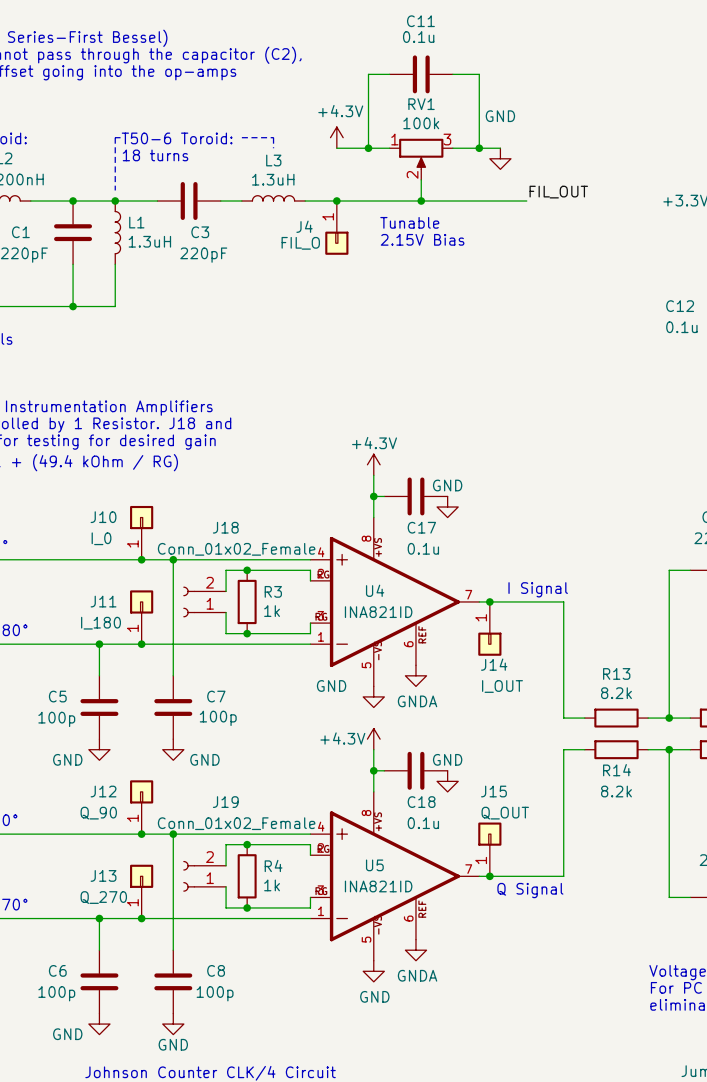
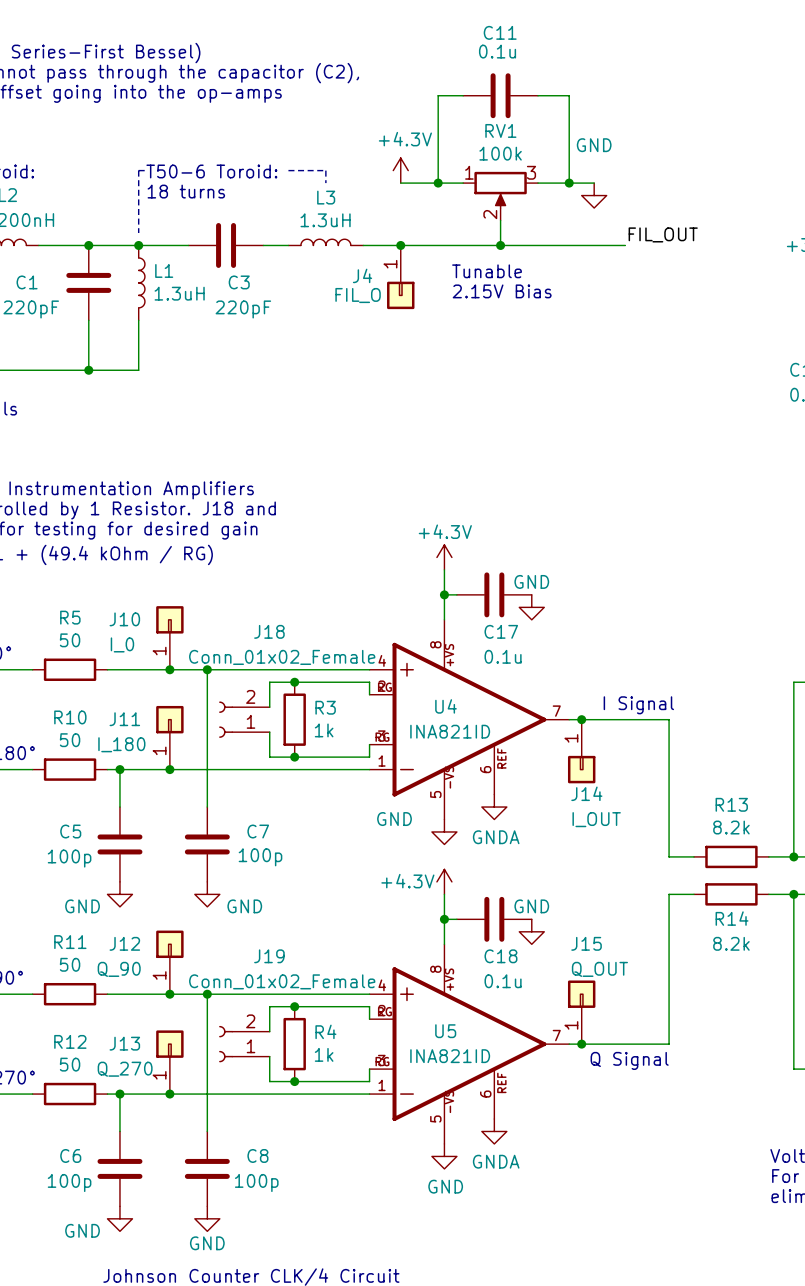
wire: (25, 559) (88, 559) -> none
R5: none -> 50 (70, 669)
wire: (25, 644) (88, 644) -> none
R10: none -> 50 (70, 769)
wire: (25, 834) (88, 834) -> none
R11: none -> 50 (70, 994)
wire: (25, 918) (88, 918) -> none
R12: none -> 50 (70, 1094)

